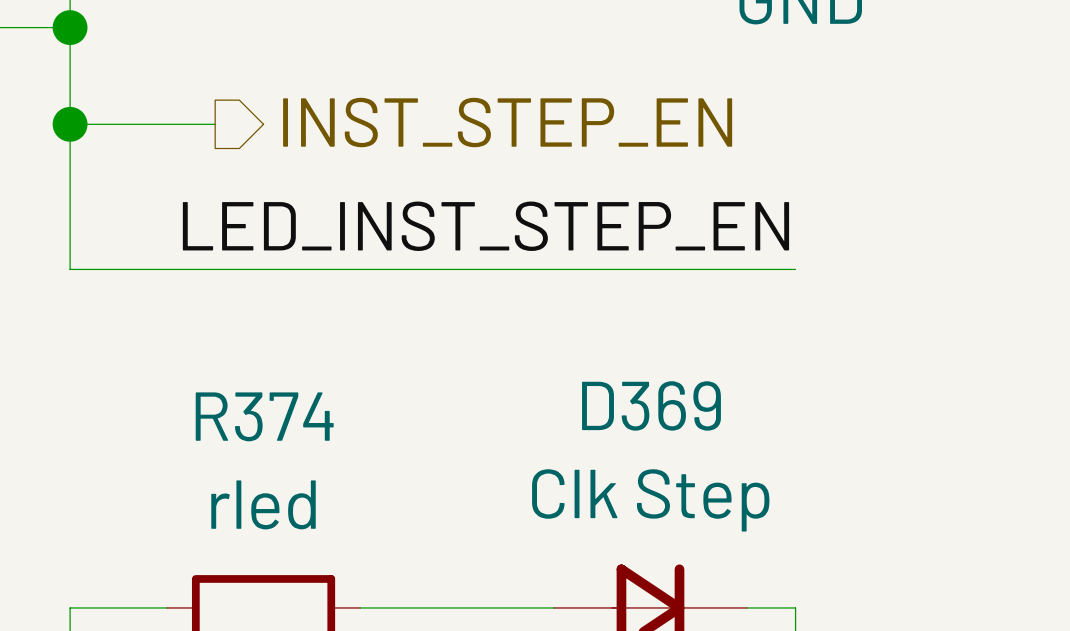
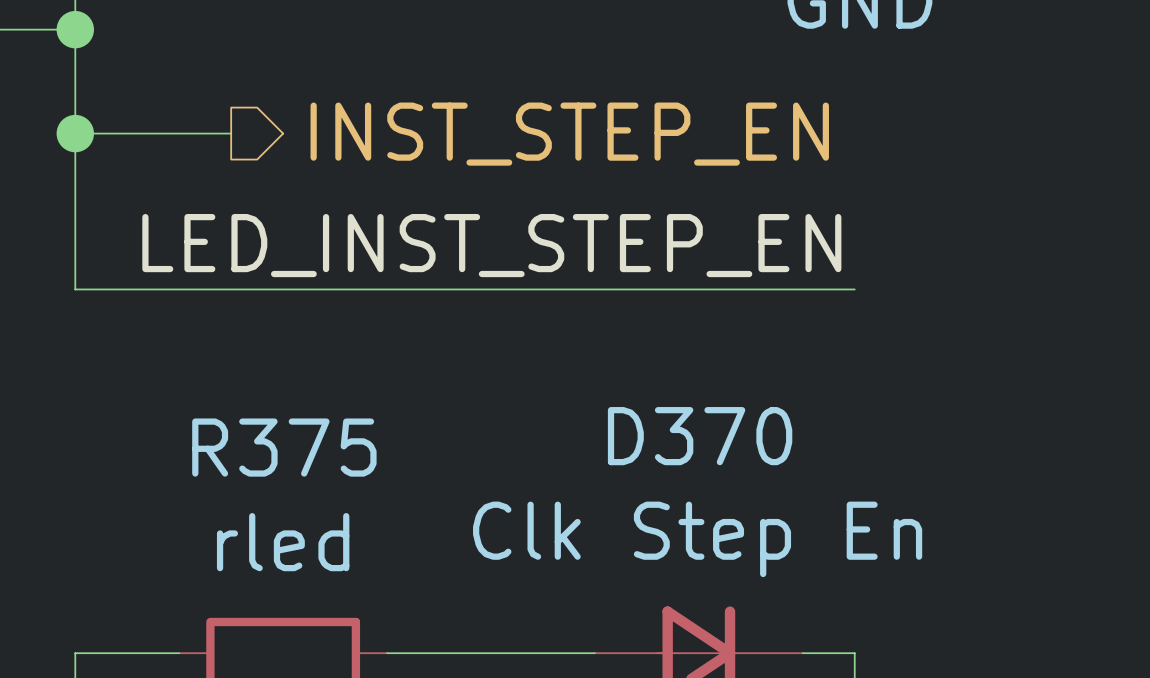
D369 name: D369 (651, 405) -> D370 (700, 436)
R374 name: R374 (264, 416) -> R375 (284, 447)
D369 value: Clk Step (650, 500) -> Clk Step En (697, 539)

